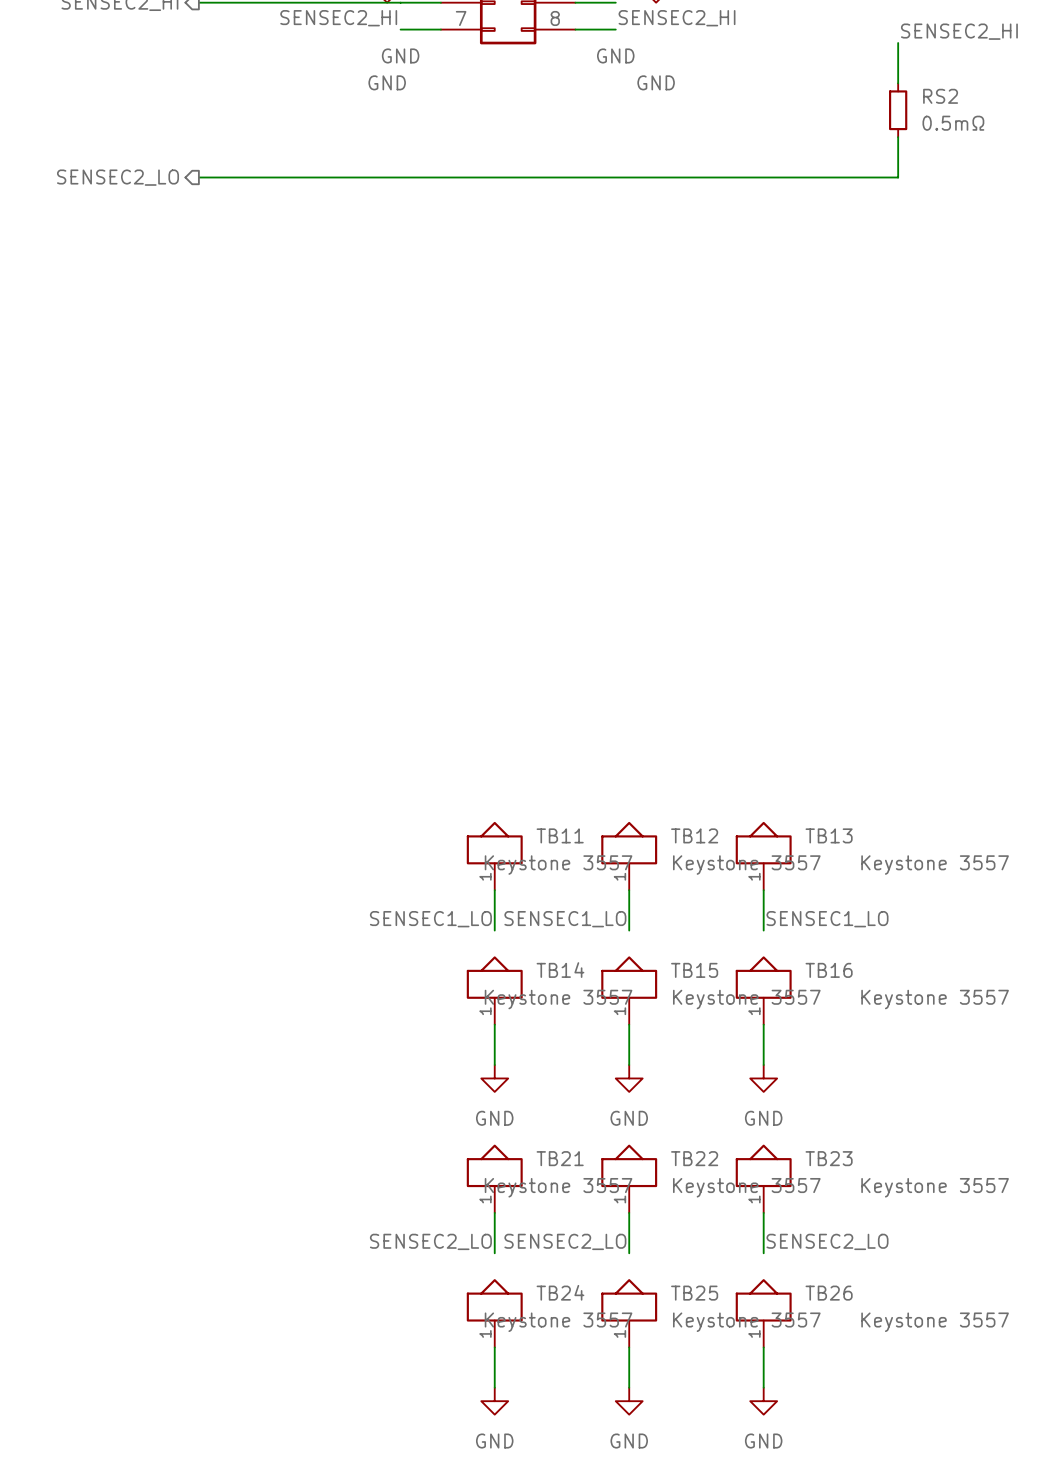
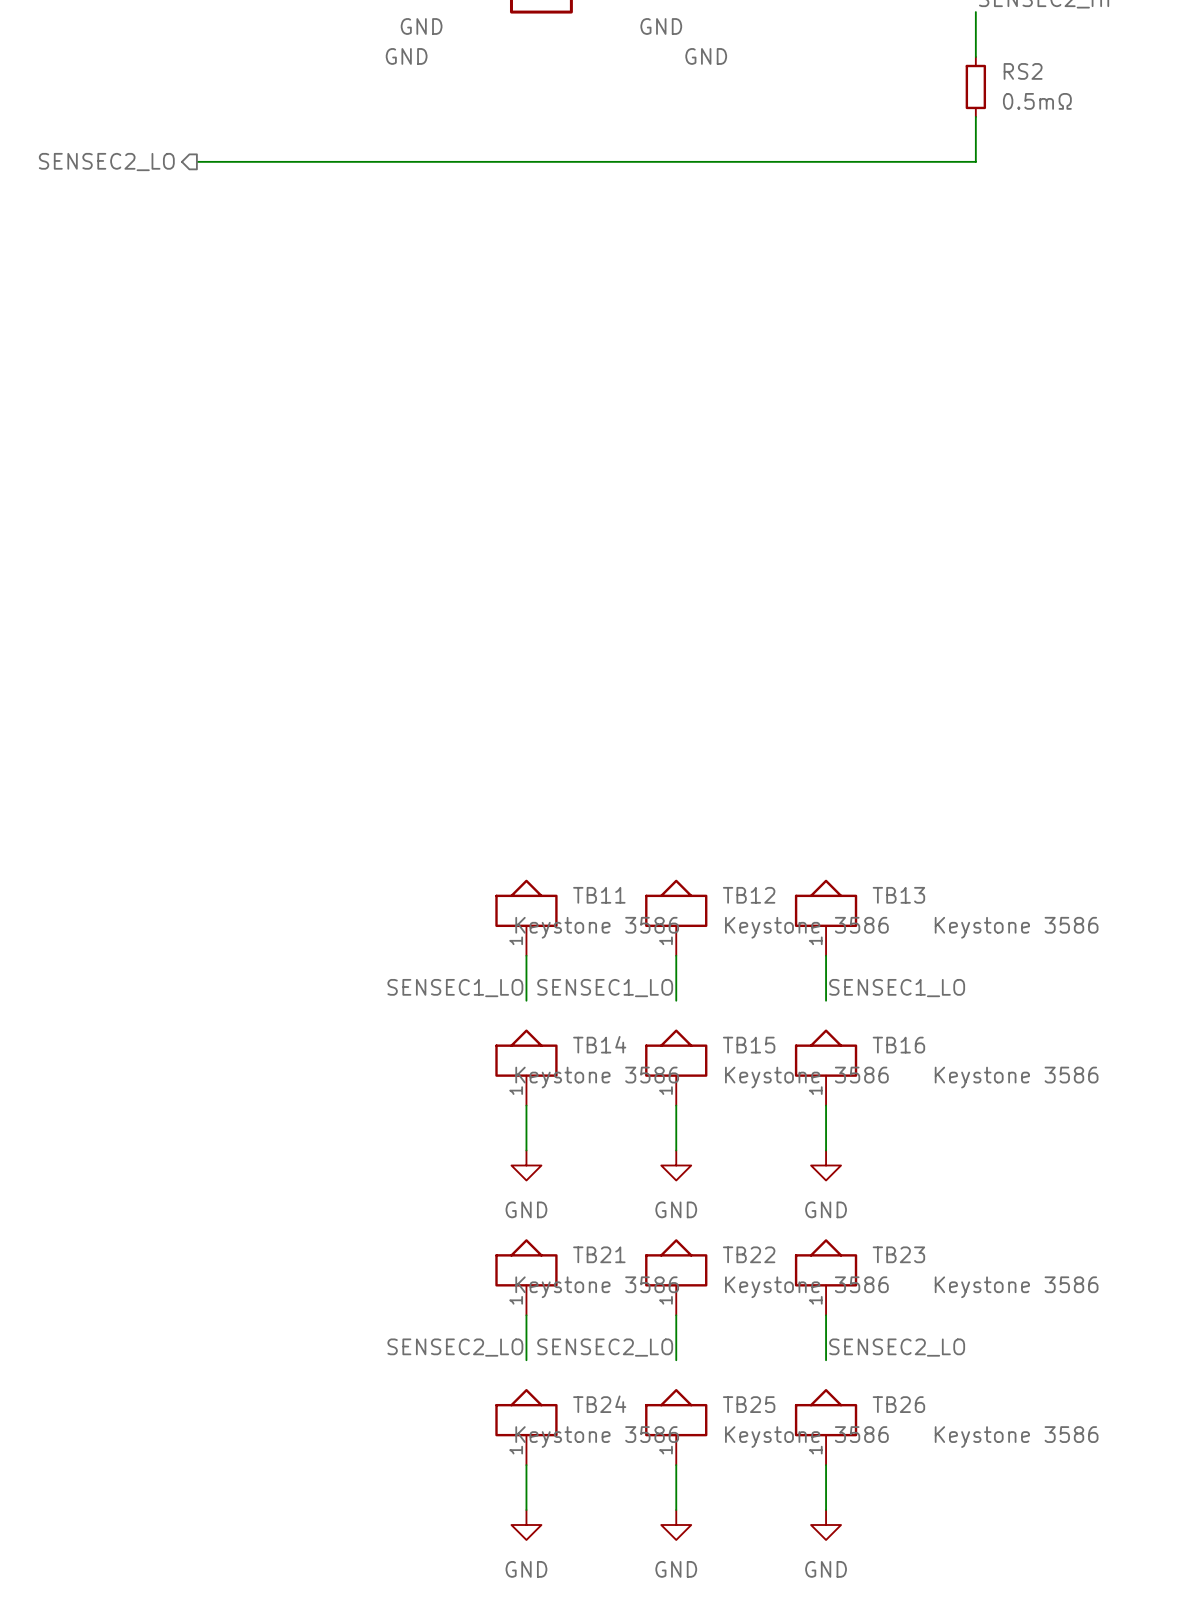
TB11 value: Keystone 3557 (558, 865) -> Keystone 3586 (597, 927)
TB12 value: Keystone 3557 (746, 865) -> Keystone 3586 (806, 927)
TB13 value: Keystone 3557 (935, 865) -> Keystone 3586 (1016, 927)
TB14 value: Keystone 3557 (558, 999) -> Keystone 3586 (597, 1077)
TB15 value: Keystone 3557 (746, 999) -> Keystone 3586 (806, 1077)
TB16 value: Keystone 3557 (935, 999) -> Keystone 3586 (1016, 1077)
TB21 value: Keystone 3557 (558, 1187) -> Keystone 3586 (597, 1287)
TB22 value: Keystone 3557 (746, 1187) -> Keystone 3586 (806, 1287)
TB23 value: Keystone 3557 (935, 1187) -> Keystone 3586 (1016, 1287)
TB24 value: Keystone 3557 (558, 1322) -> Keystone 3586 (597, 1437)
TB25 value: Keystone 3557 (746, 1322) -> Keystone 3586 (806, 1437)
TB26 value: Keystone 3557 (935, 1322) -> Keystone 3586 (1016, 1437)

